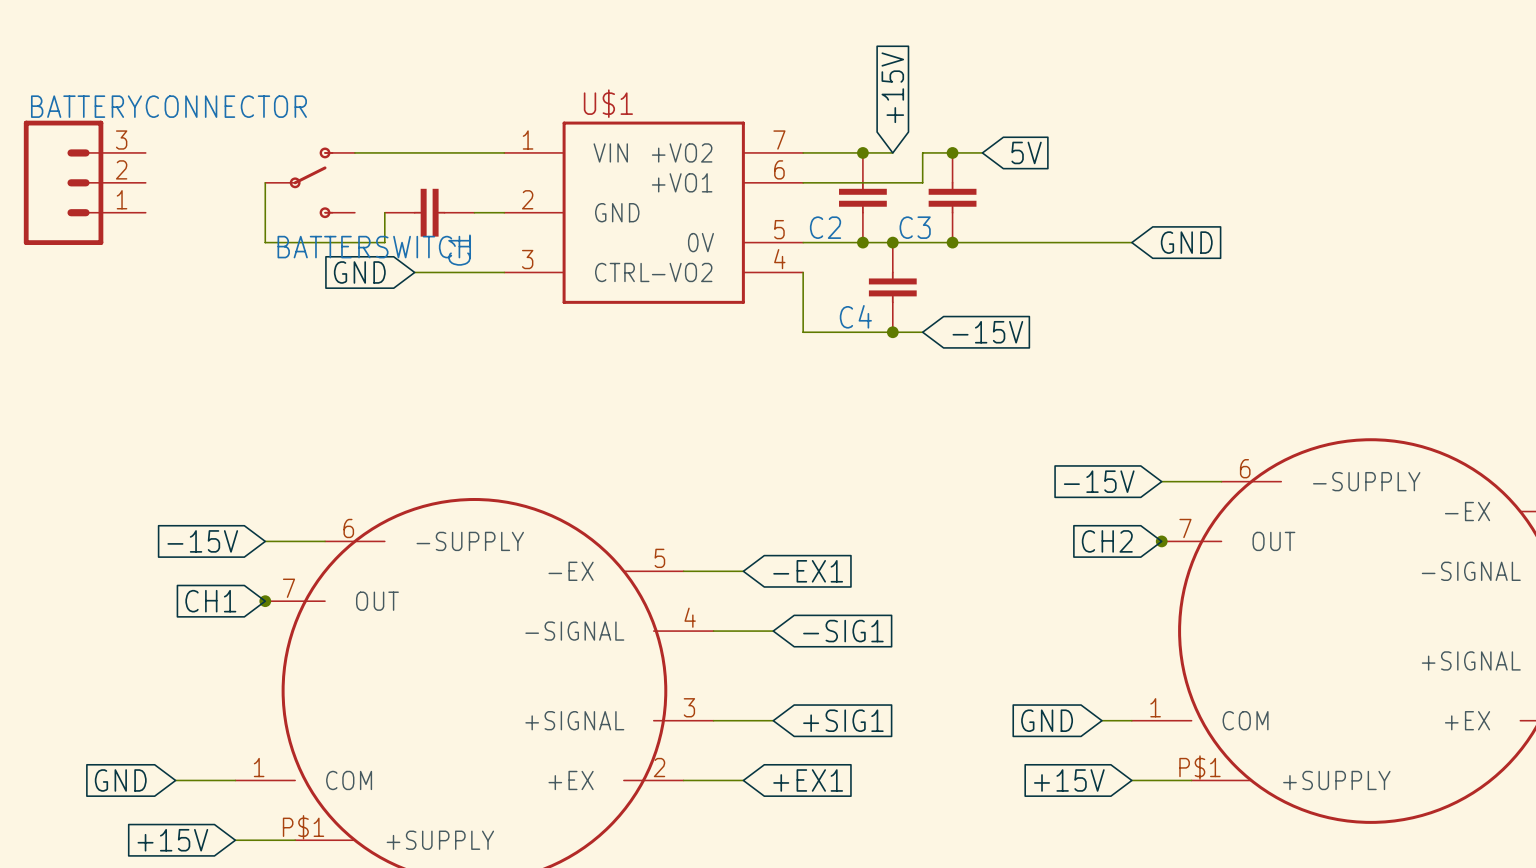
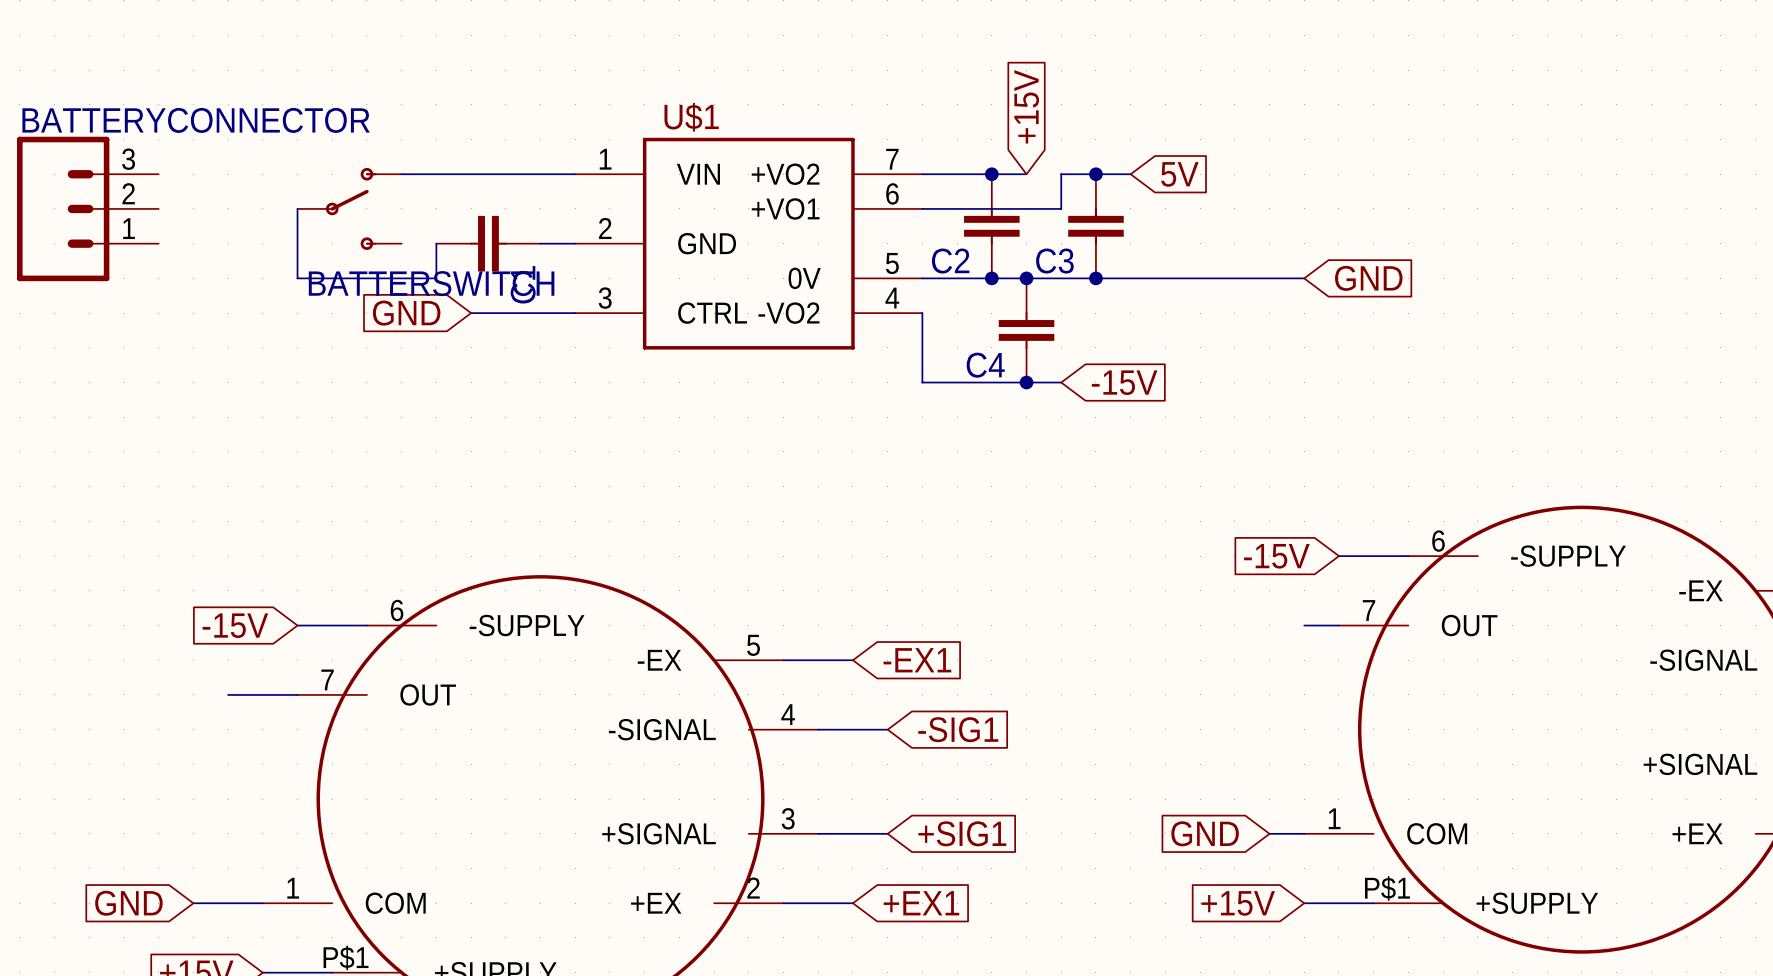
global label: CH2 (1107, 541) -> none
wire: none -> (1304, 625) (1338, 625)
junction: (1161, 541) -> none
wire: none -> (228, 694) (297, 694)
global label: CH1 (210, 601) -> none
junction: (265, 601) -> none

